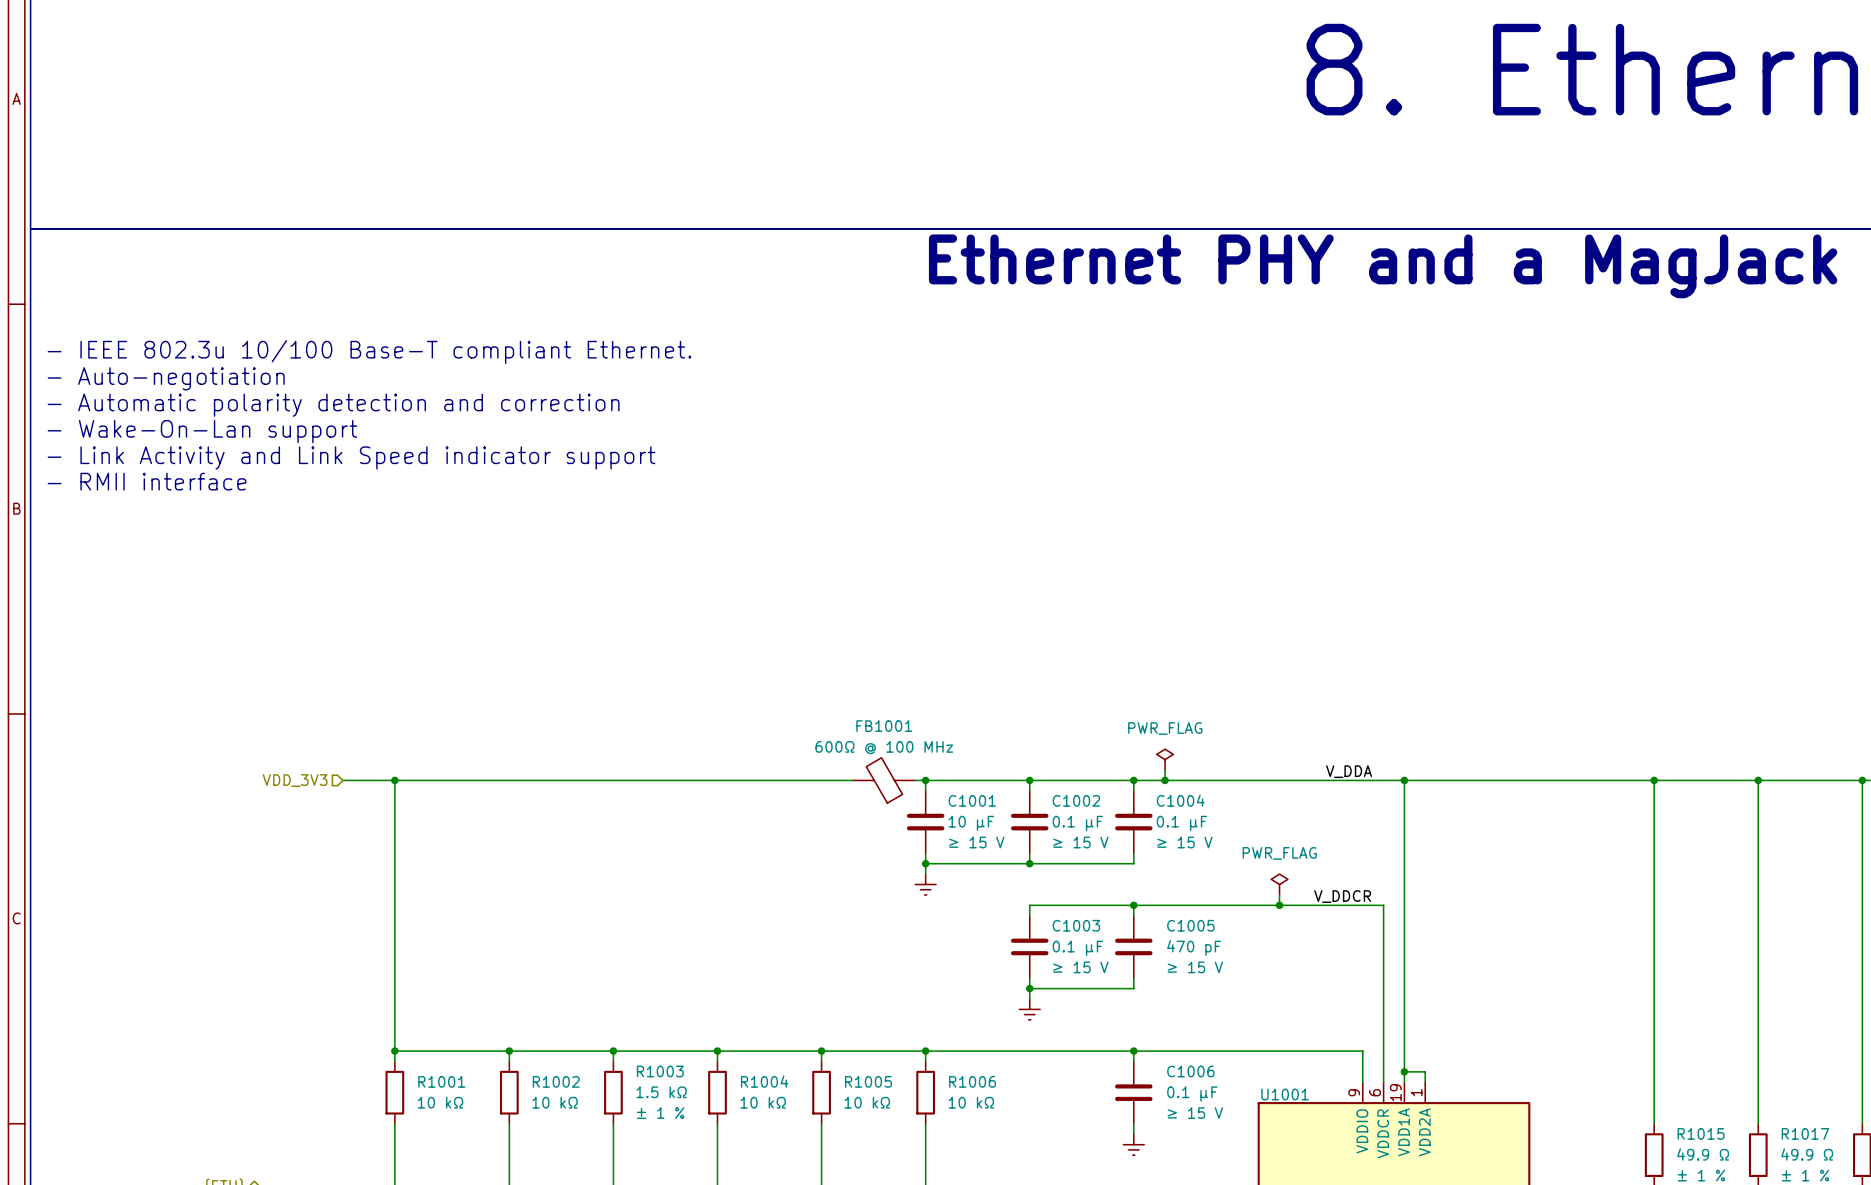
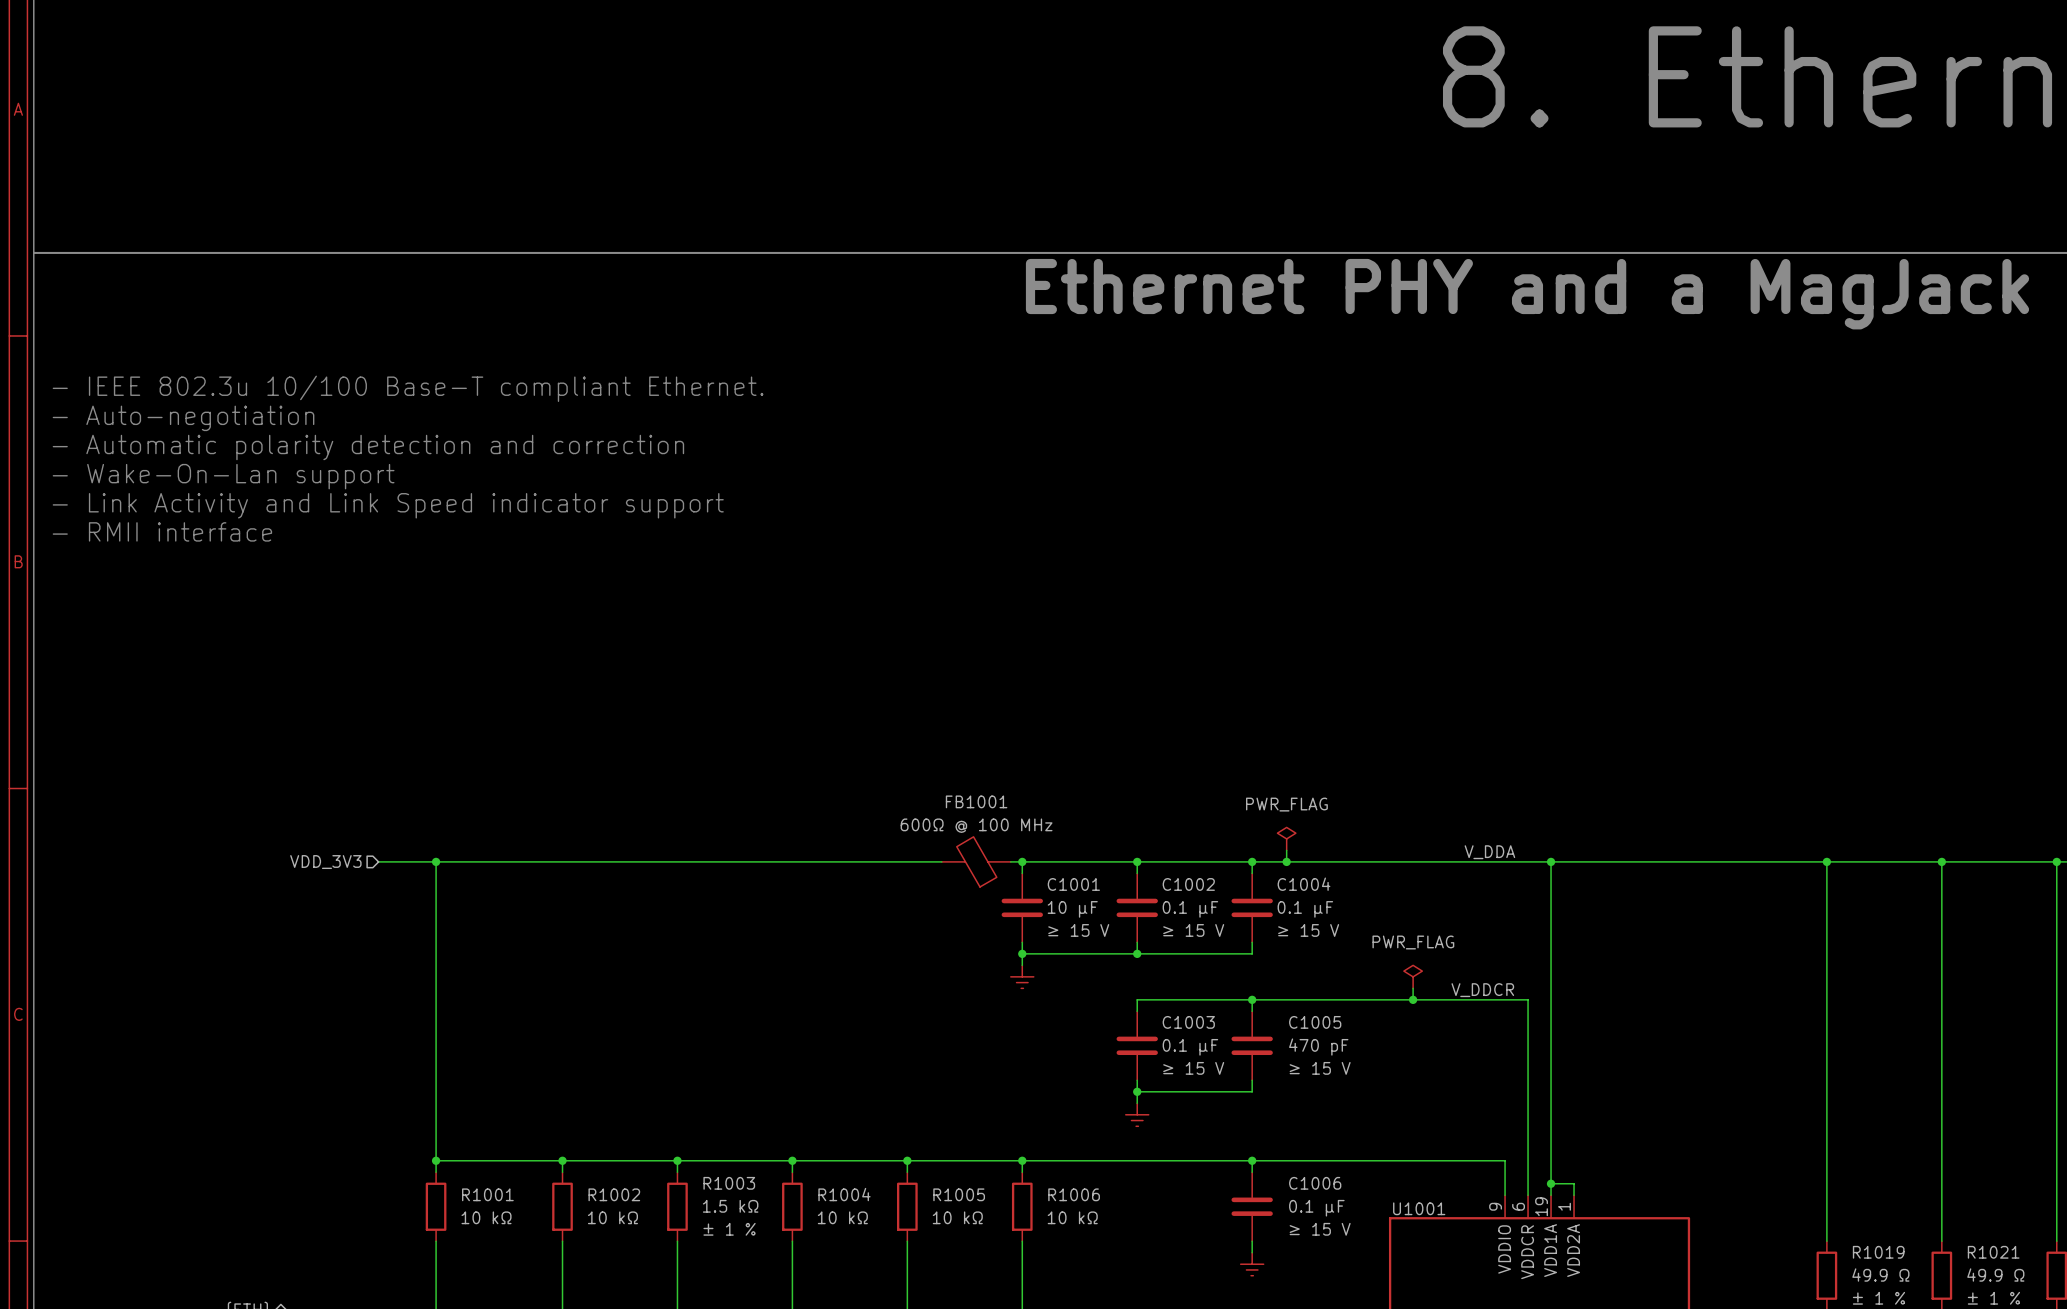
R1015 name: R1015 (1701, 1133) -> R1019 (1878, 1252)
R1017 name: R1017 (1805, 1133) -> R1021 (1993, 1252)

